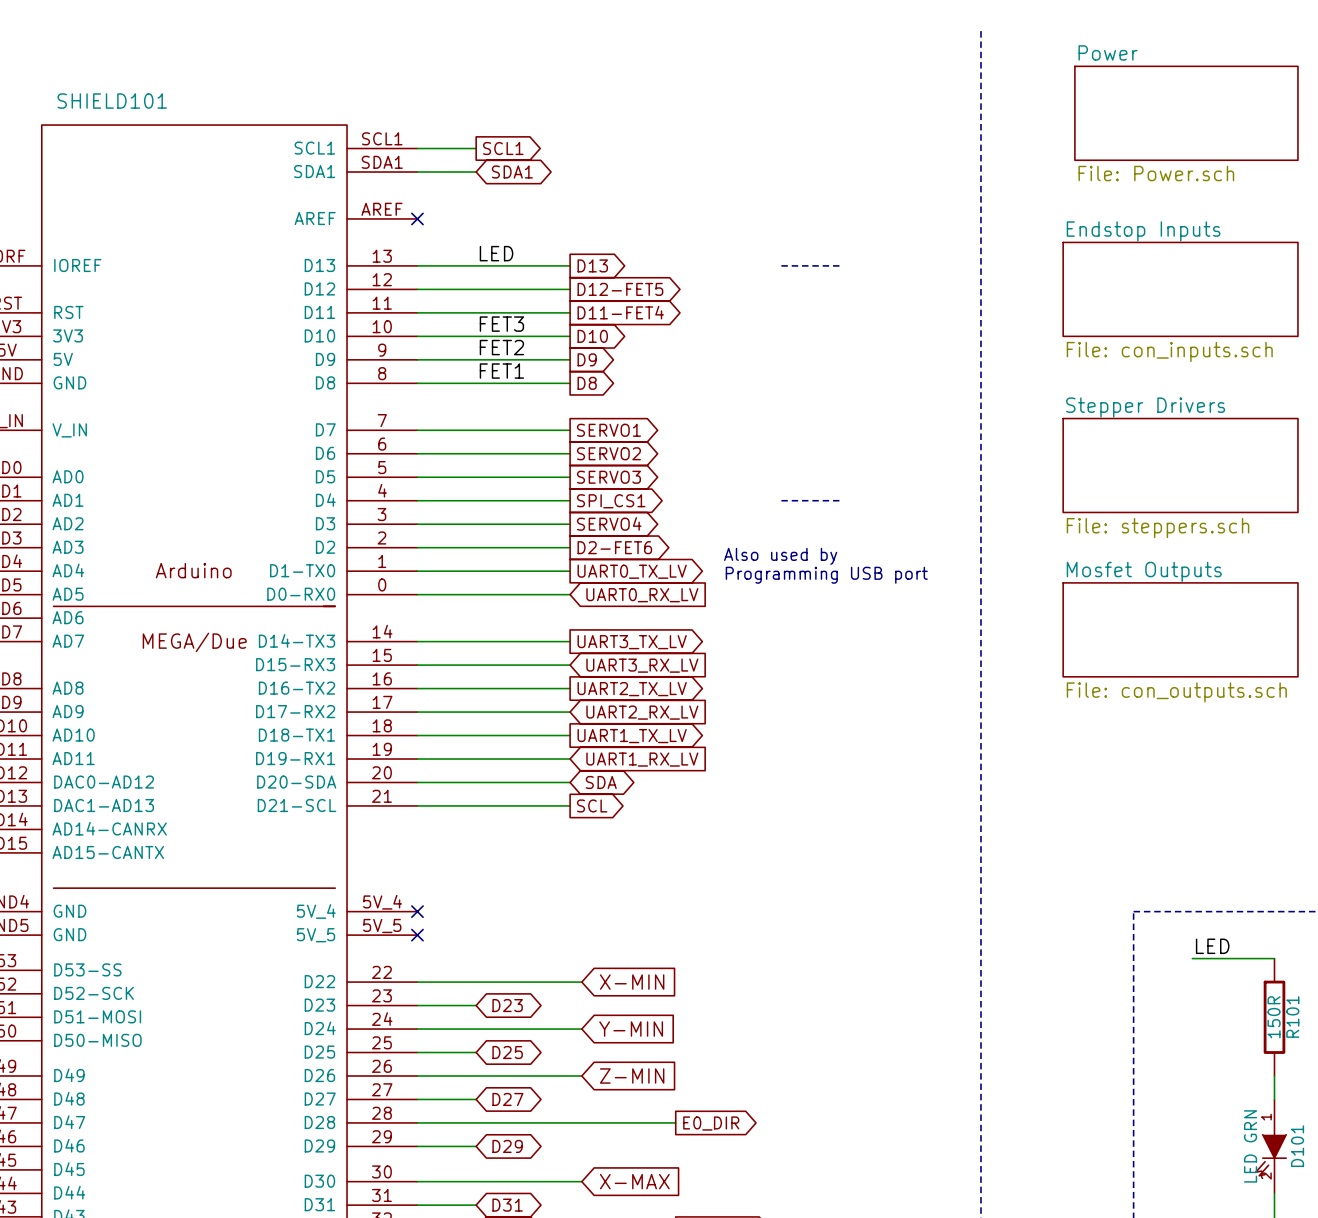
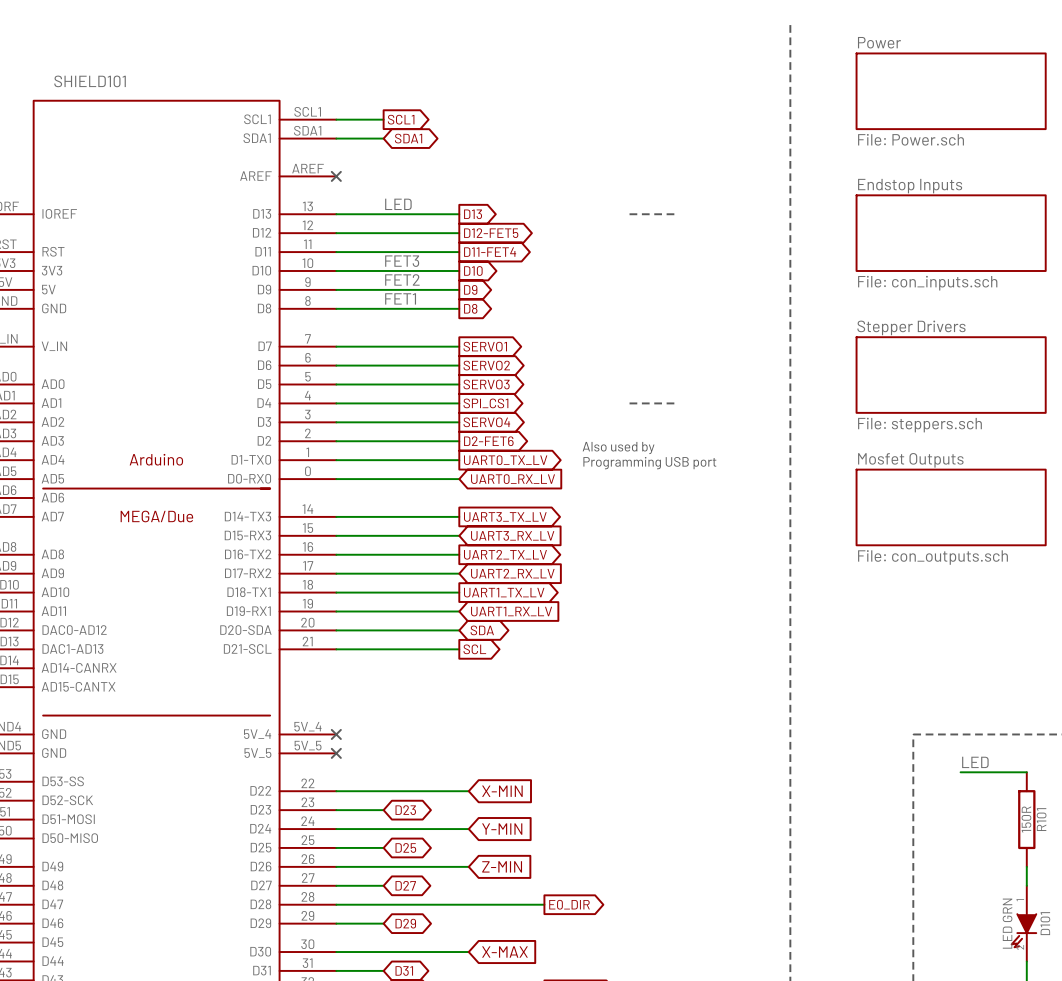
sheet Power shape: [1074, 66, 1298, 161] -> [856, 53, 1046, 130]

